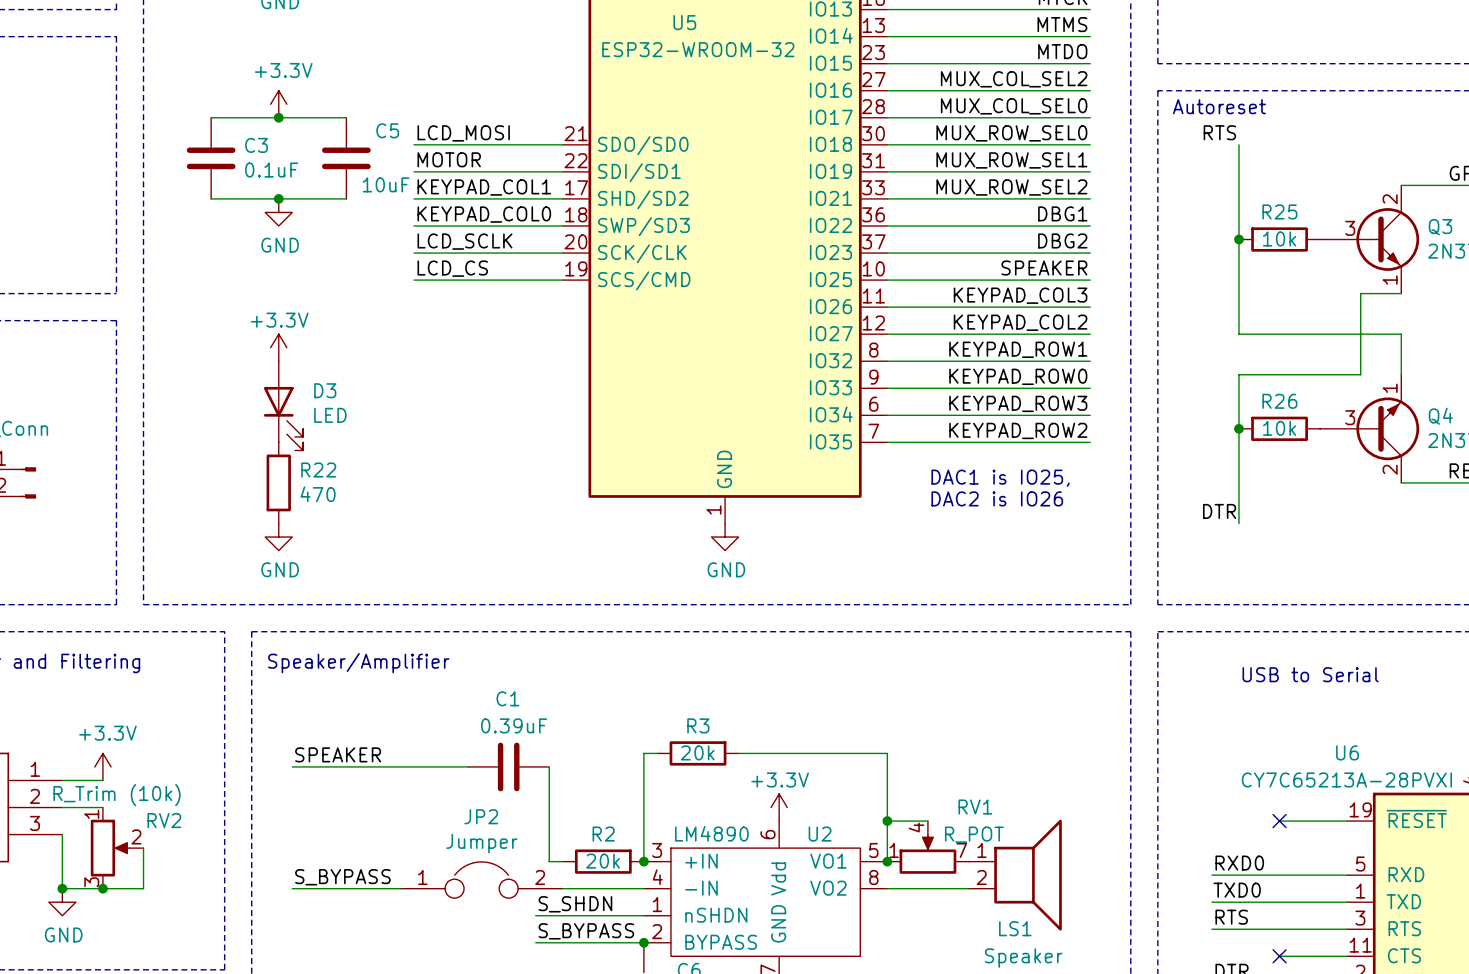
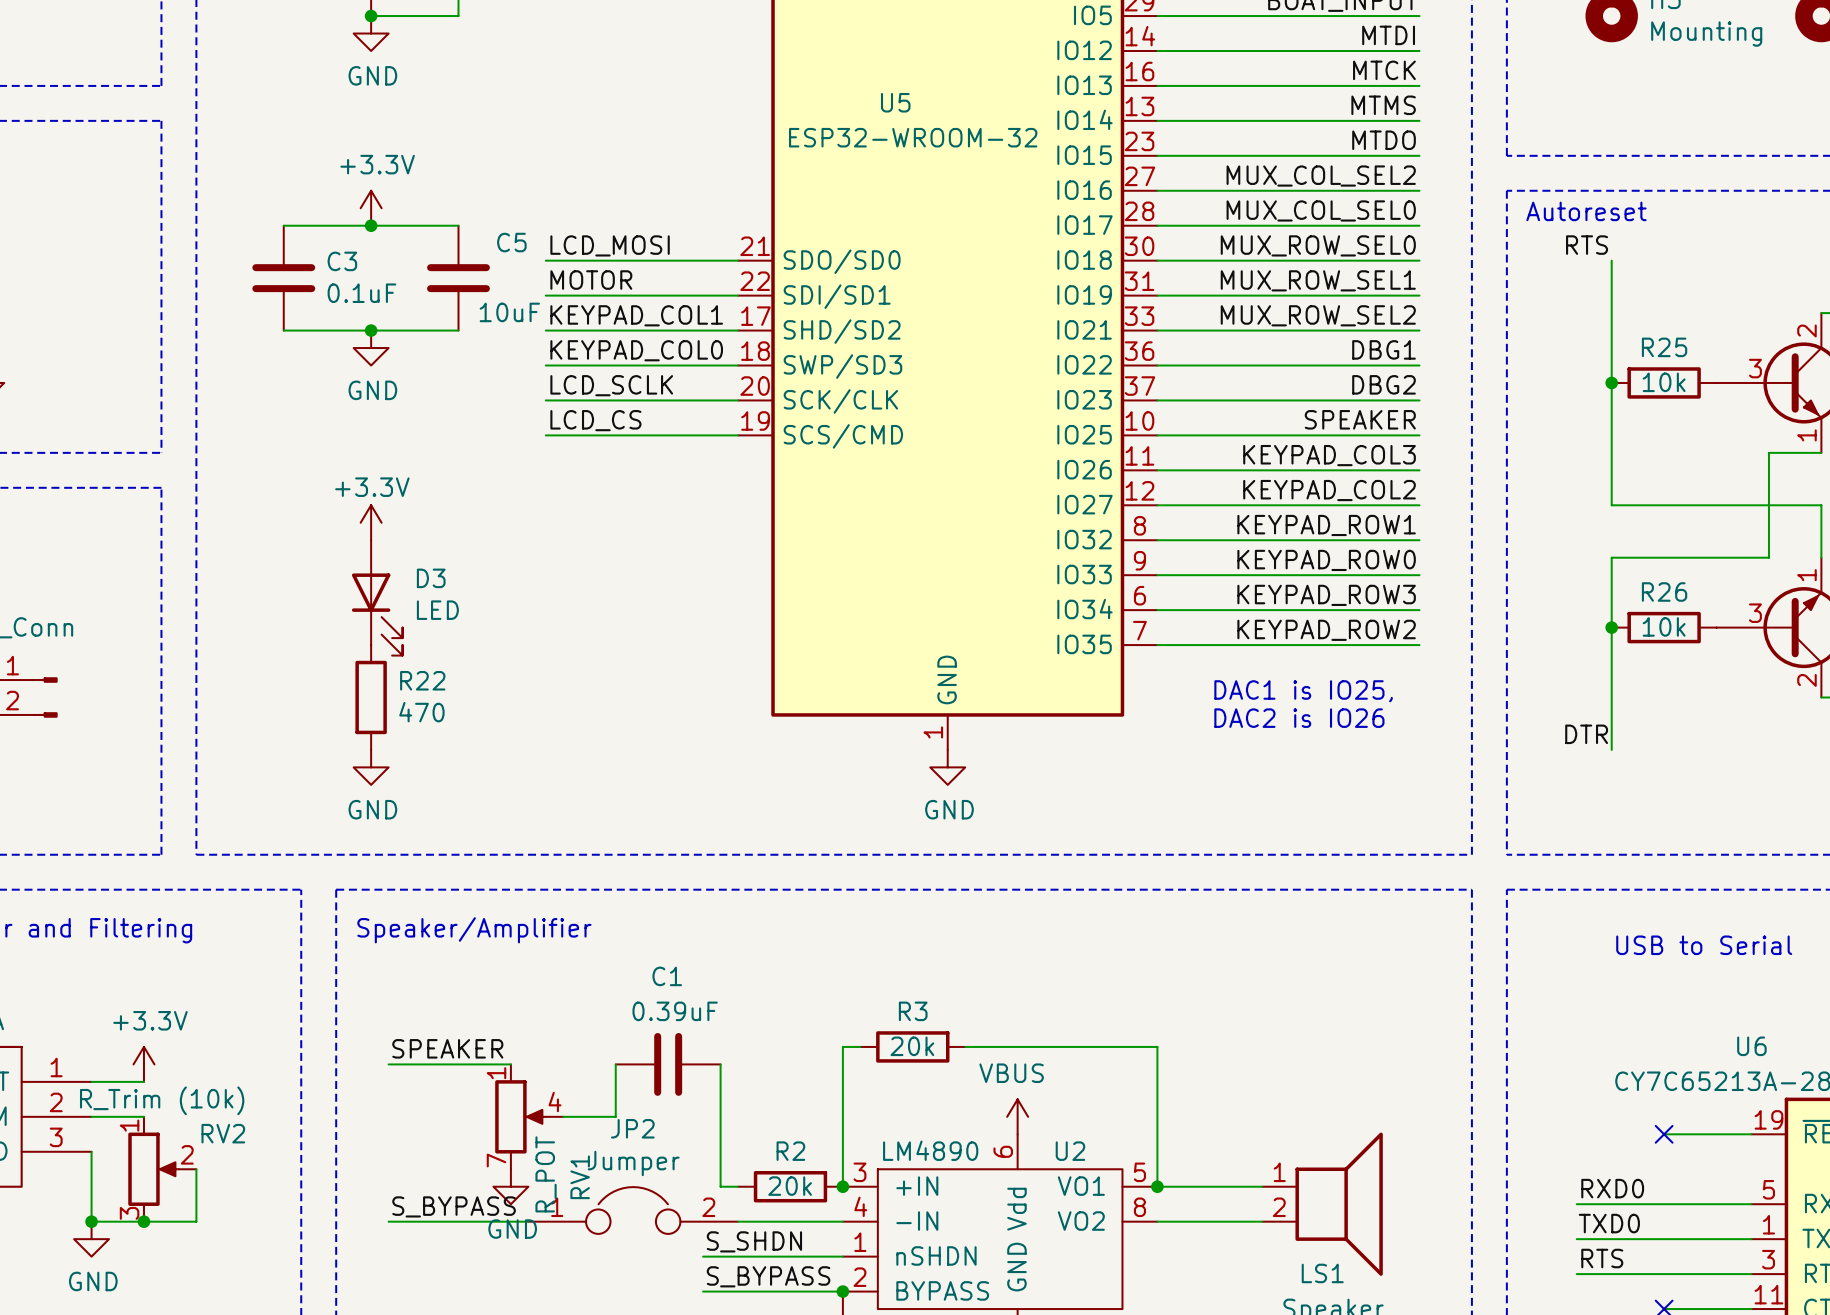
wire: (386, 766) (468, 766) -> (563, 1116) (615, 1116) (615, 1064)
power symbol: +3.3V (779, 807) -> VBUS (1017, 1116)
wire: (887, 821) (927, 821) -> none
junction: (887, 821) -> none
RV1 position: (927, 847) -> (529, 1116)
RV1 rotation: 0° (927, 854) -> 90° clockwise (520, 1116)
power symbol: none -> GND (510, 1186)
wire: none -> (1157, 1186) (1262, 1186)

